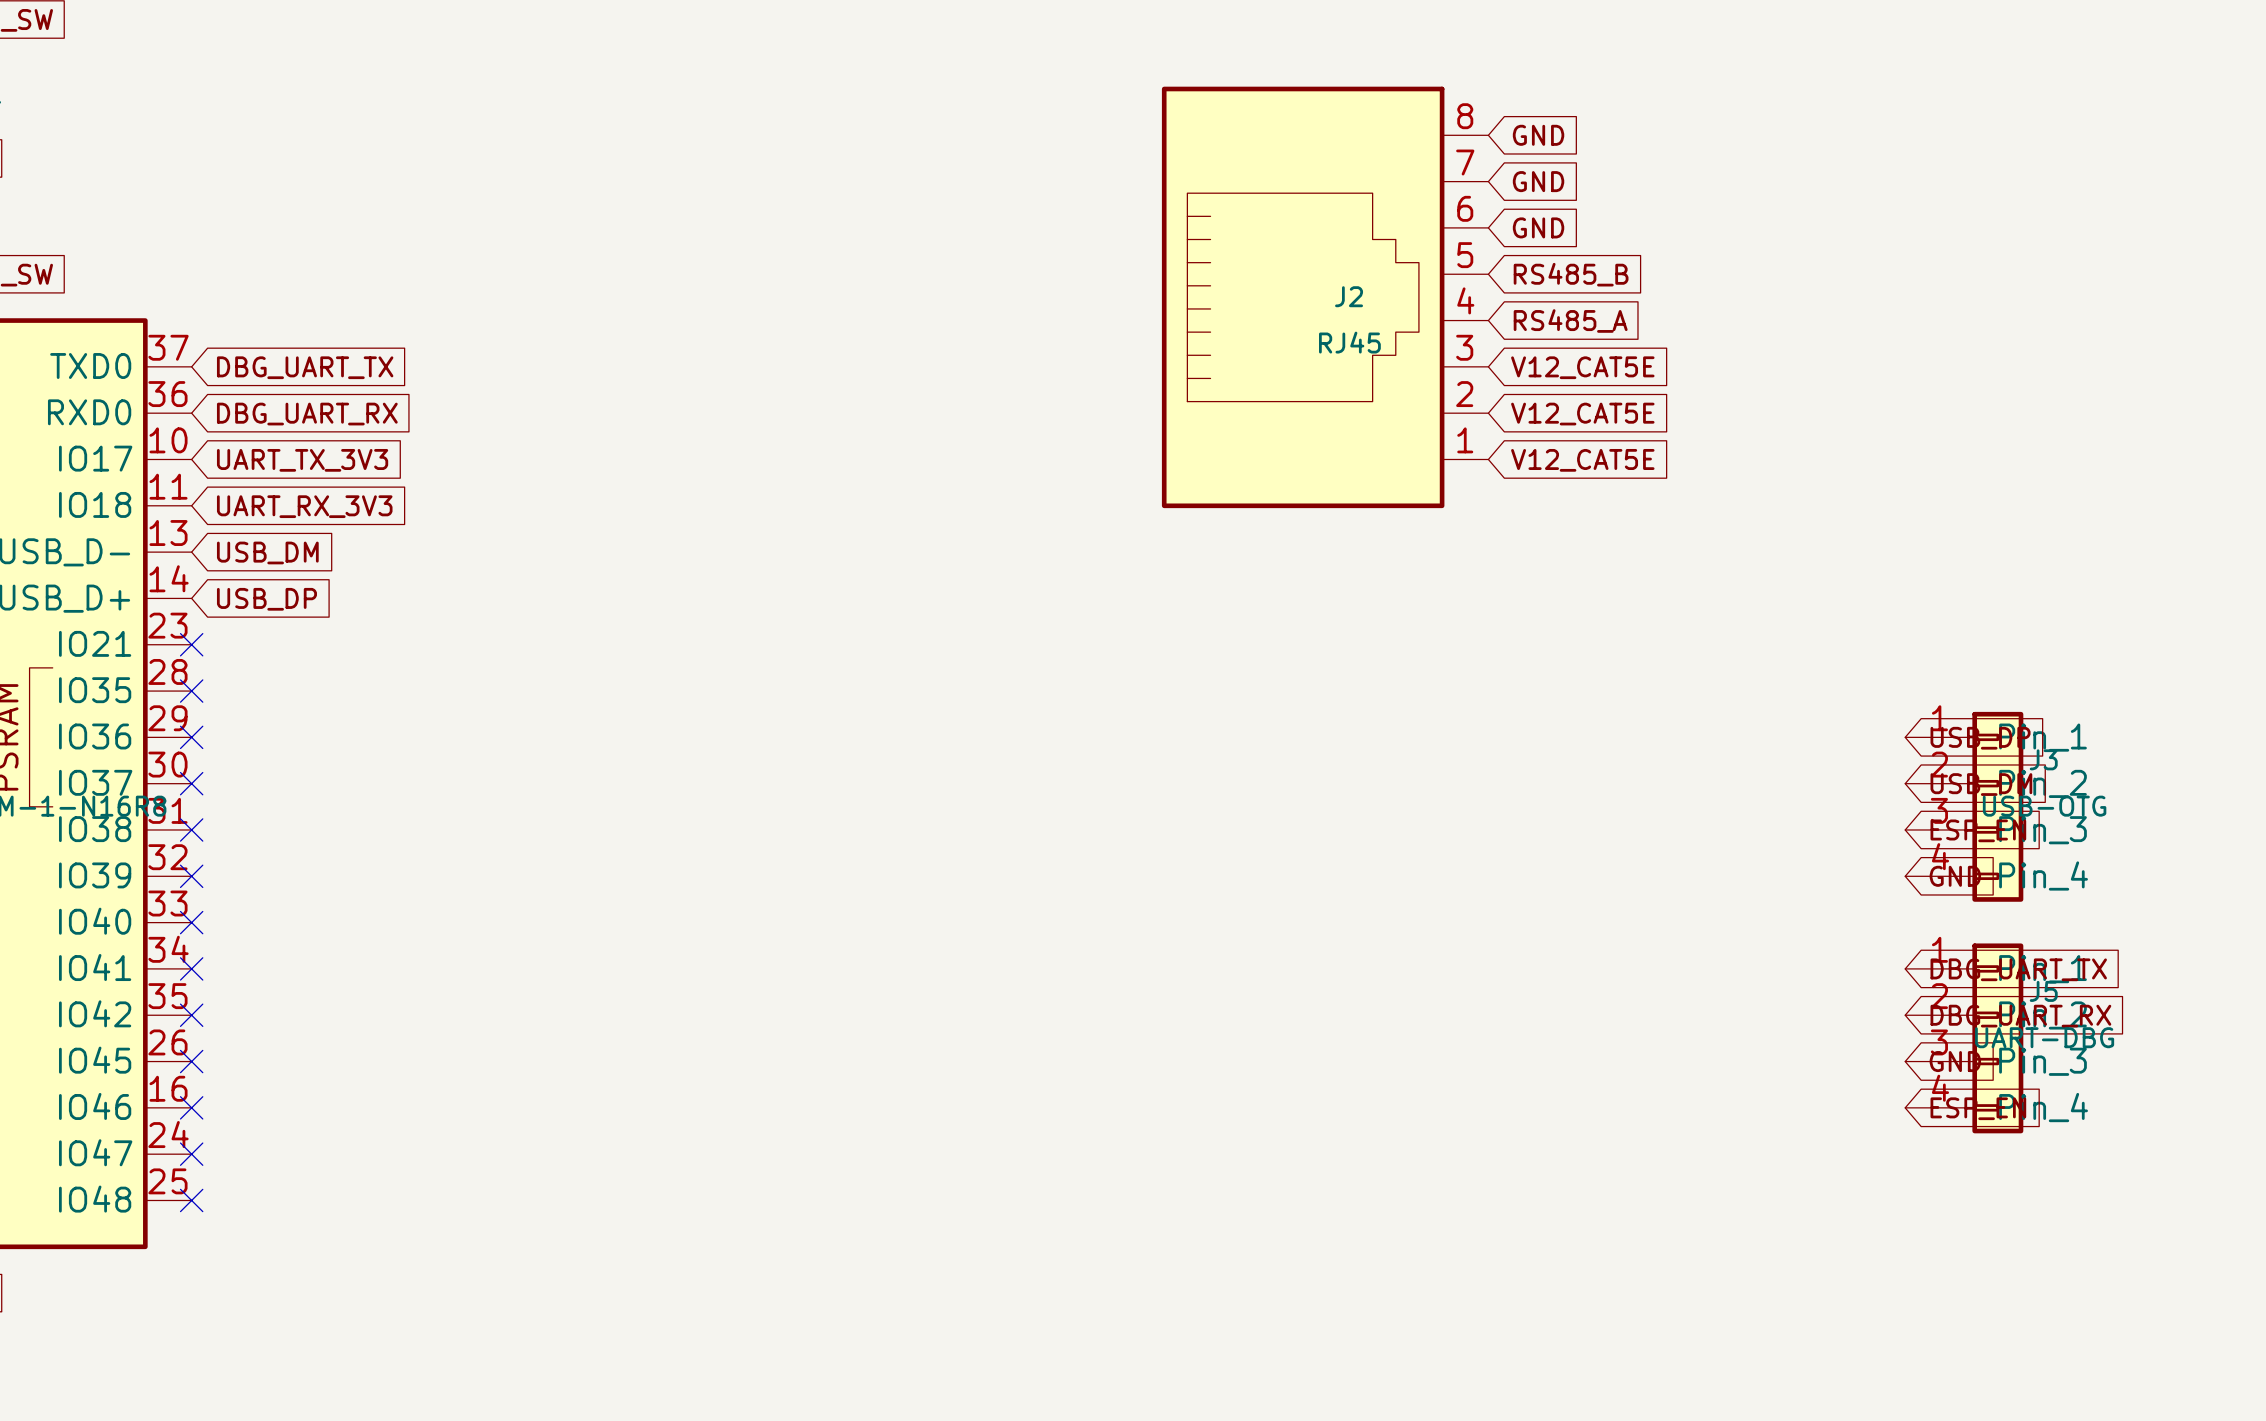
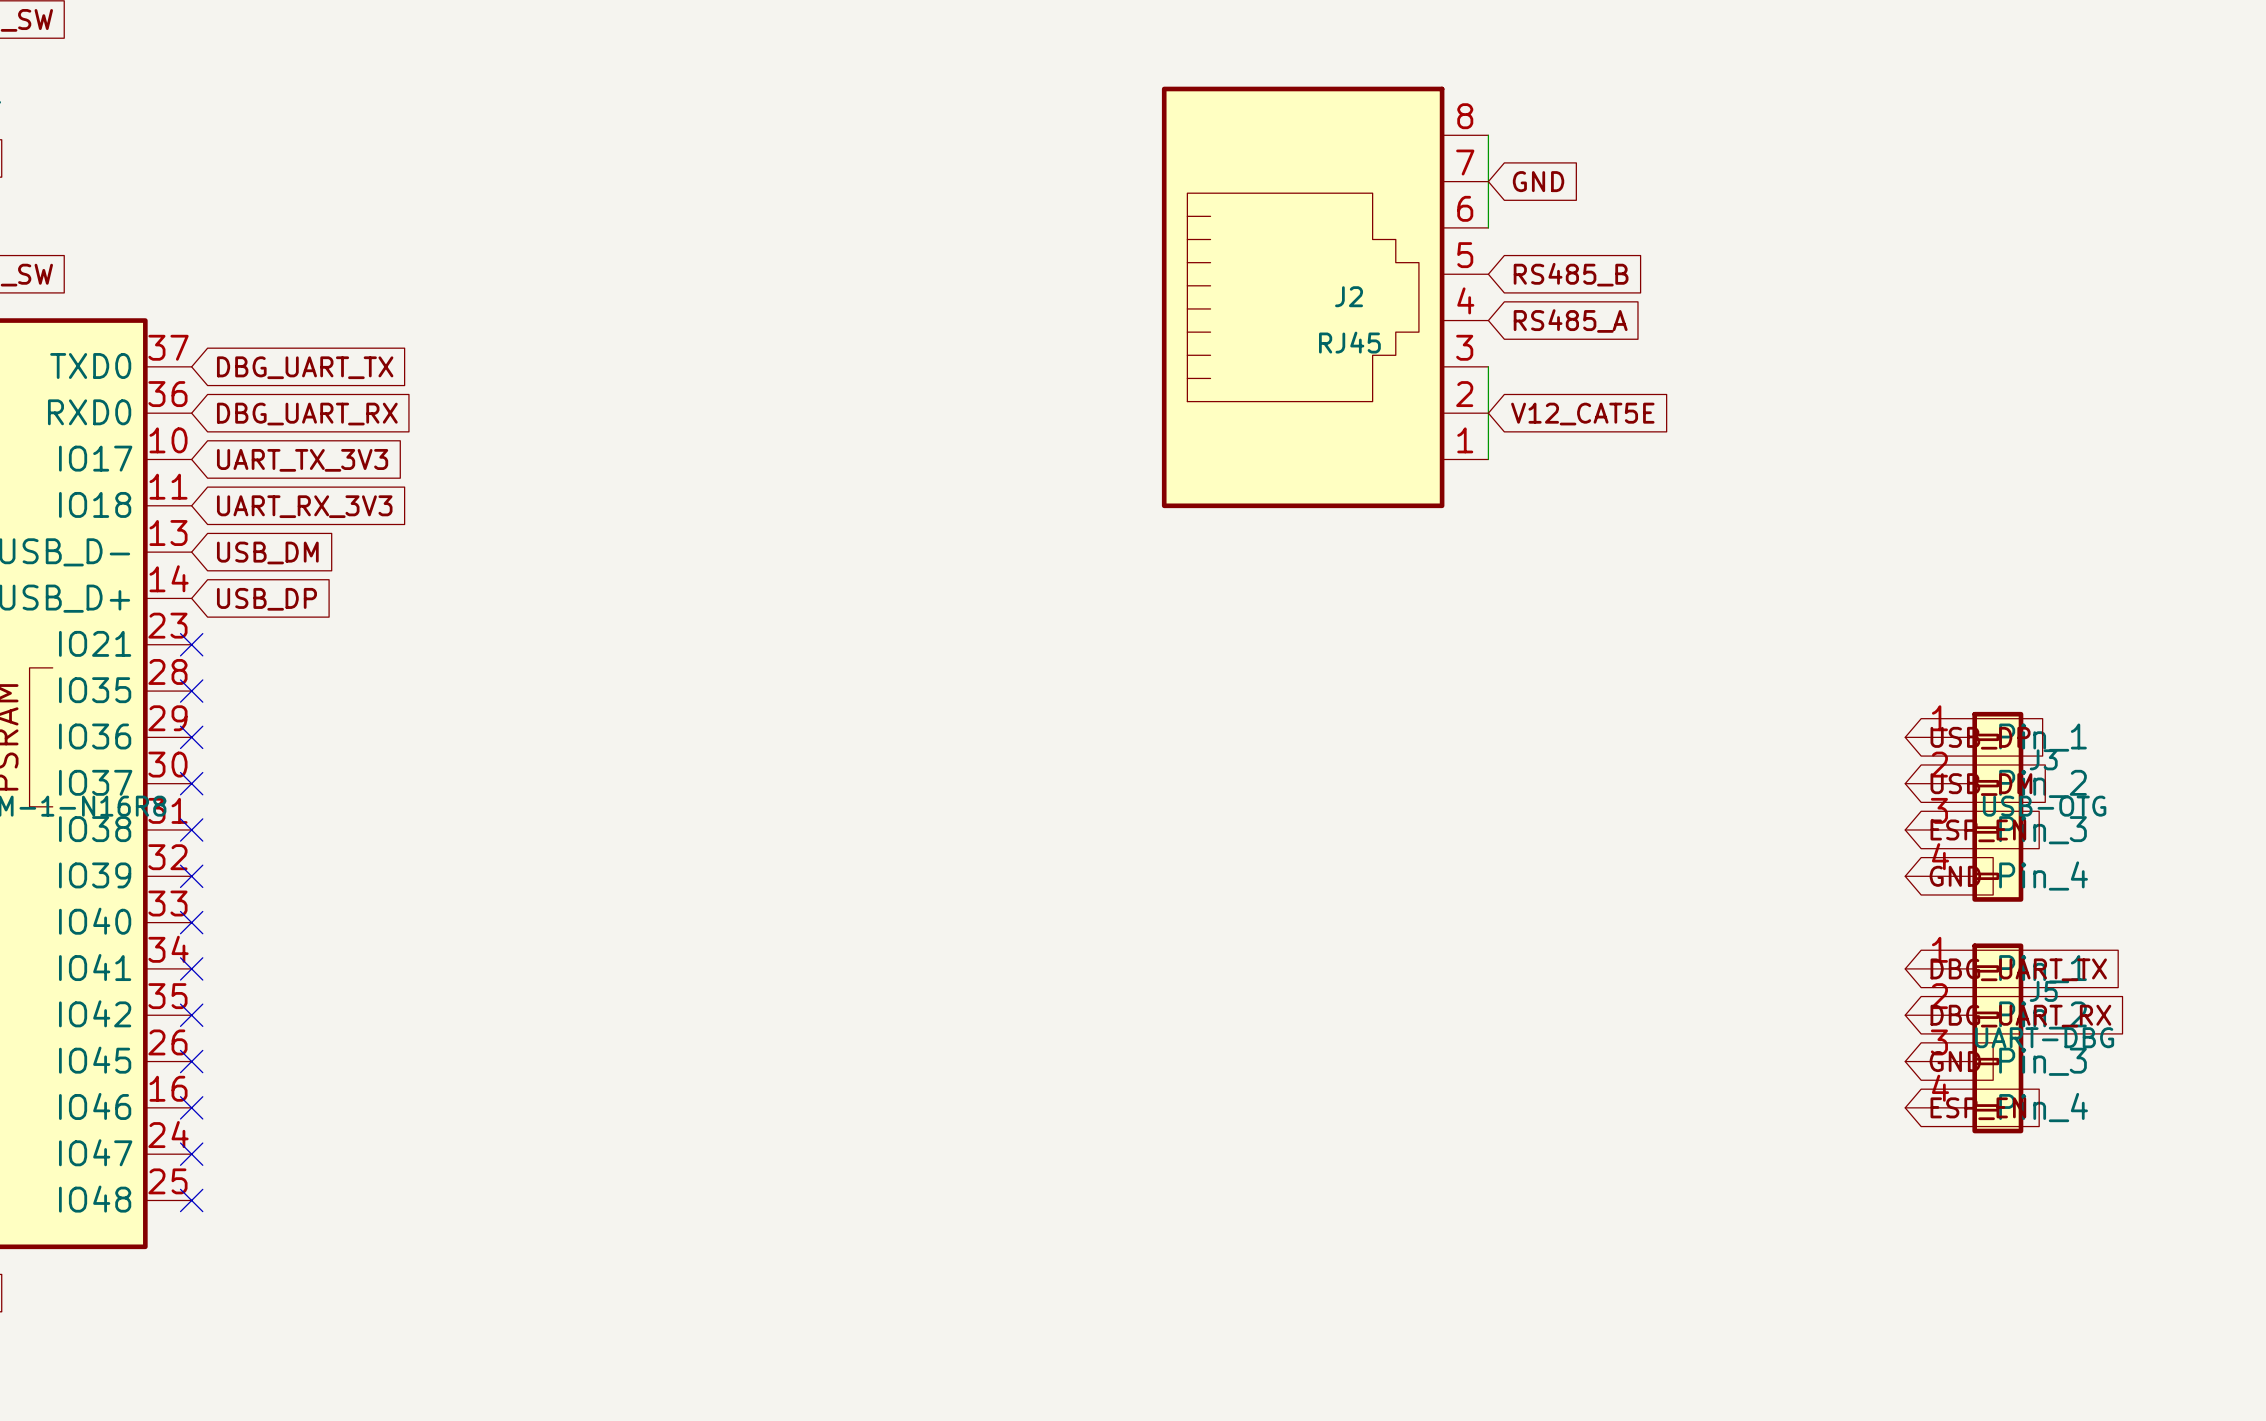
wire: none -> (1488, 135) (1488, 227)
global label: GND (1538, 135) -> none
global label: GND (1538, 227) -> none
wire: none -> (1488, 366) (1488, 459)
global label: V12_CAT5E (1582, 367) -> none
global label: V12_CAT5E (1582, 460) -> none

